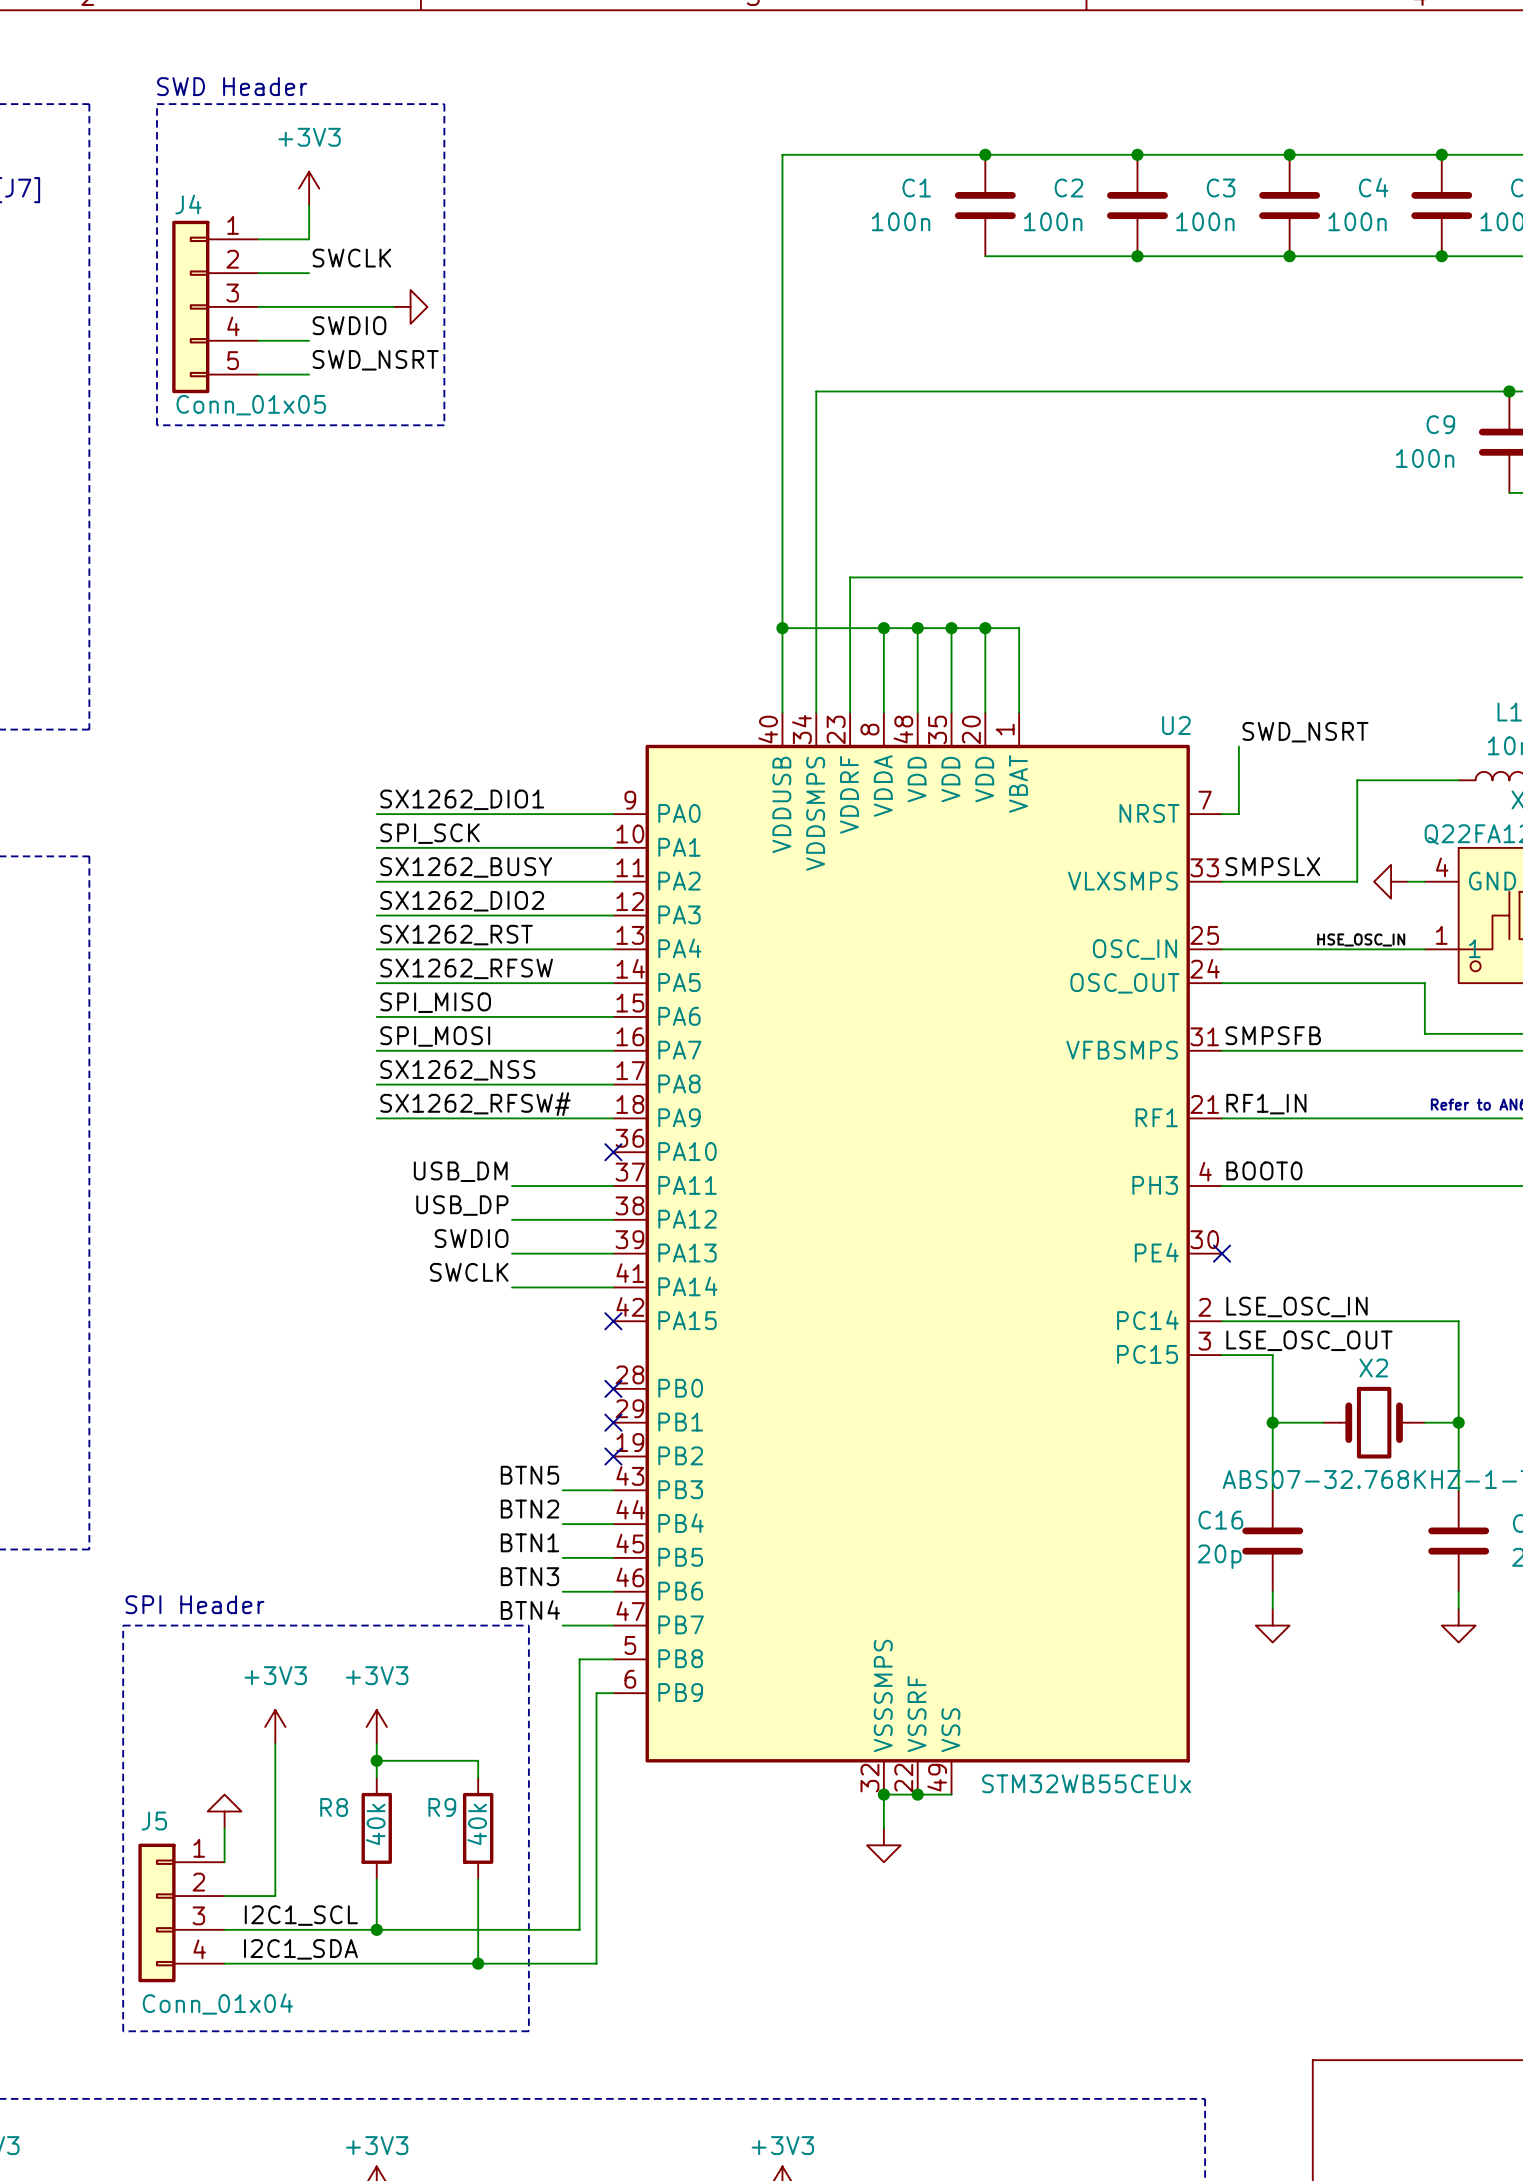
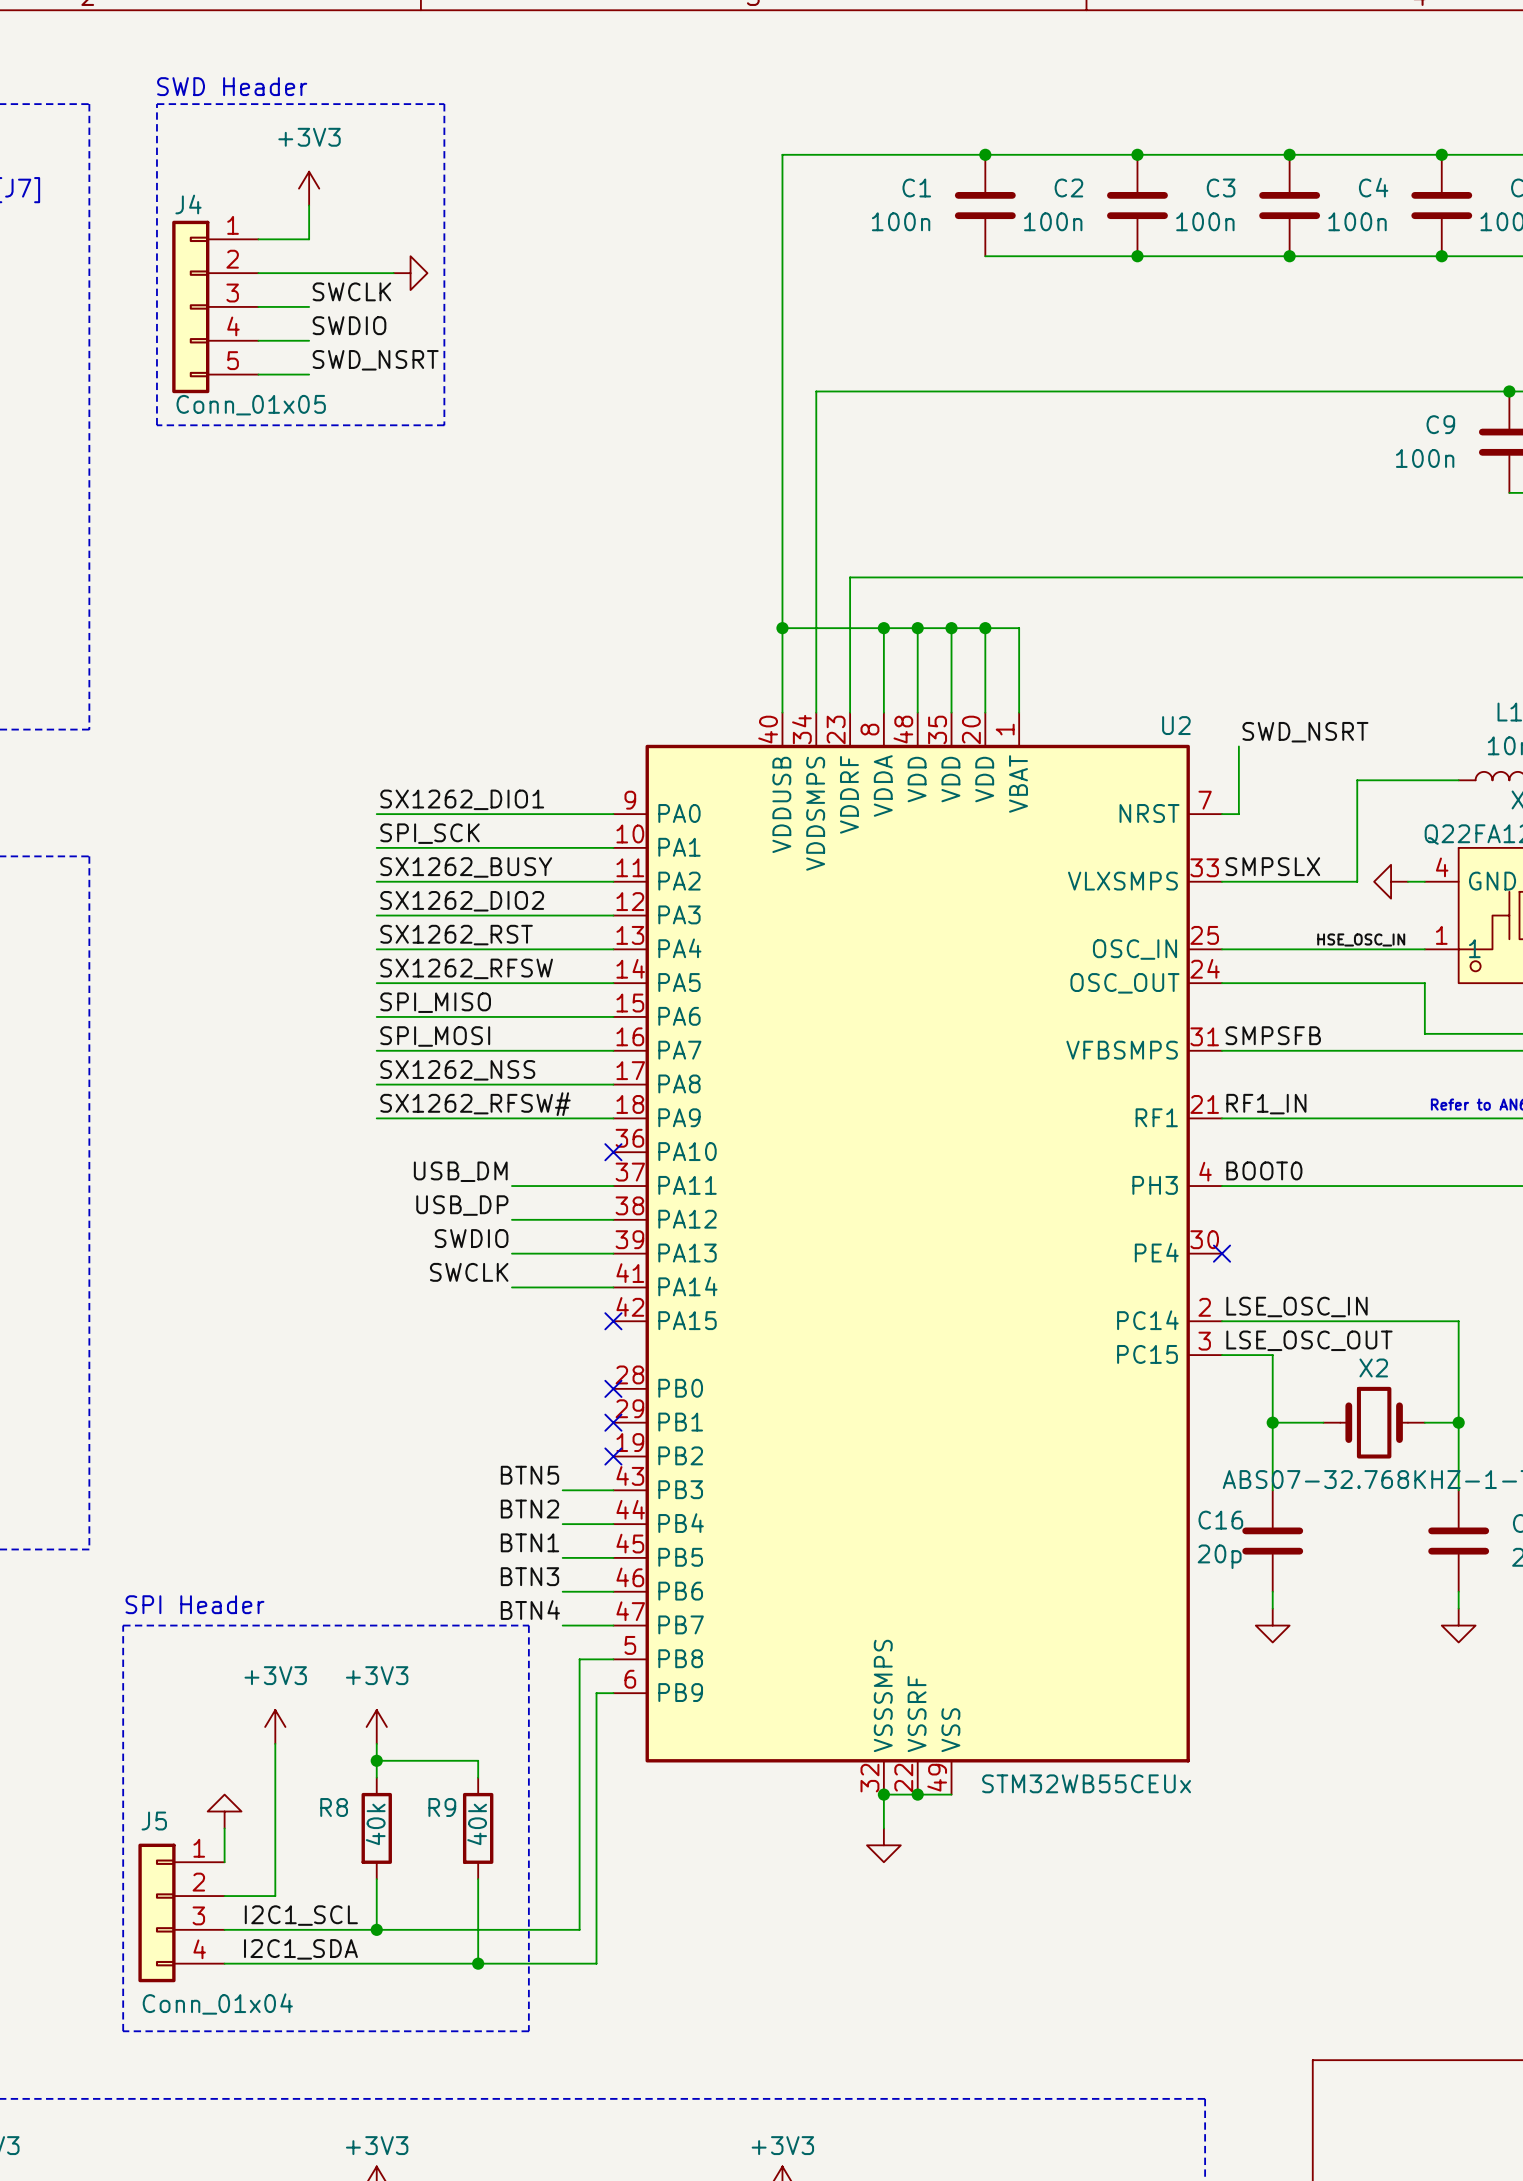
label position: SWCLK (351, 258) -> SWCLK (351, 291)
wire: (309, 306) (393, 306) -> (309, 273) (393, 273)
power symbol position: (410, 306) -> (410, 273)

